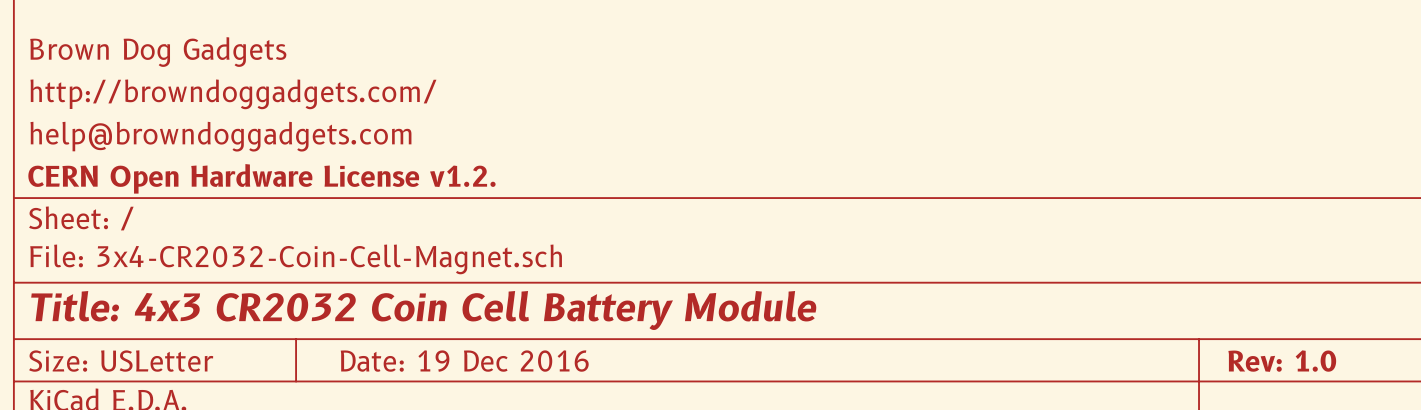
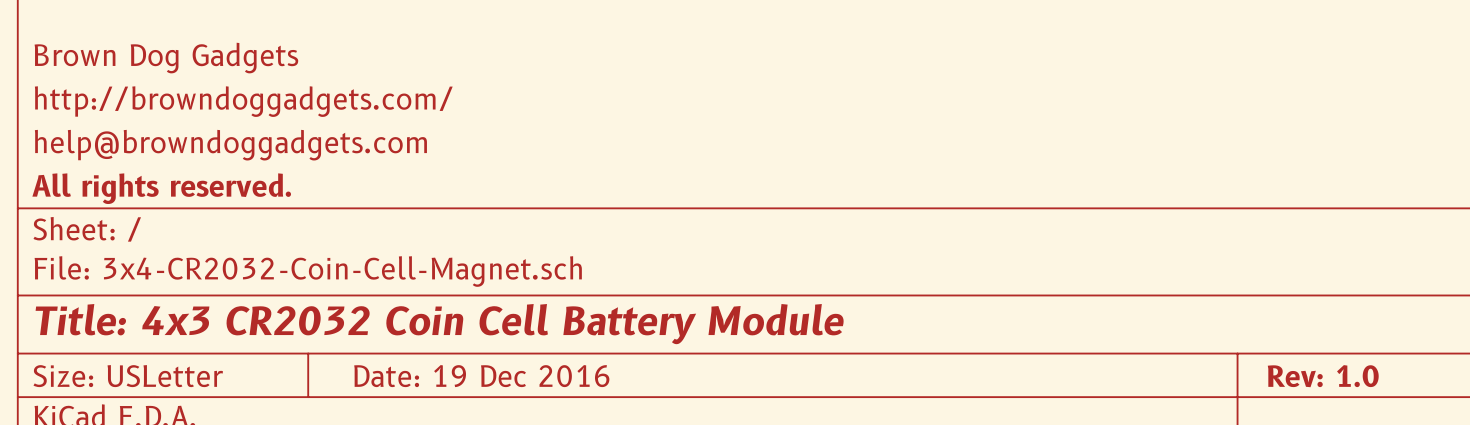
title block: CERN Open Hardware License v1.2. (261, 178) -> All rights reserved. (161, 188)

